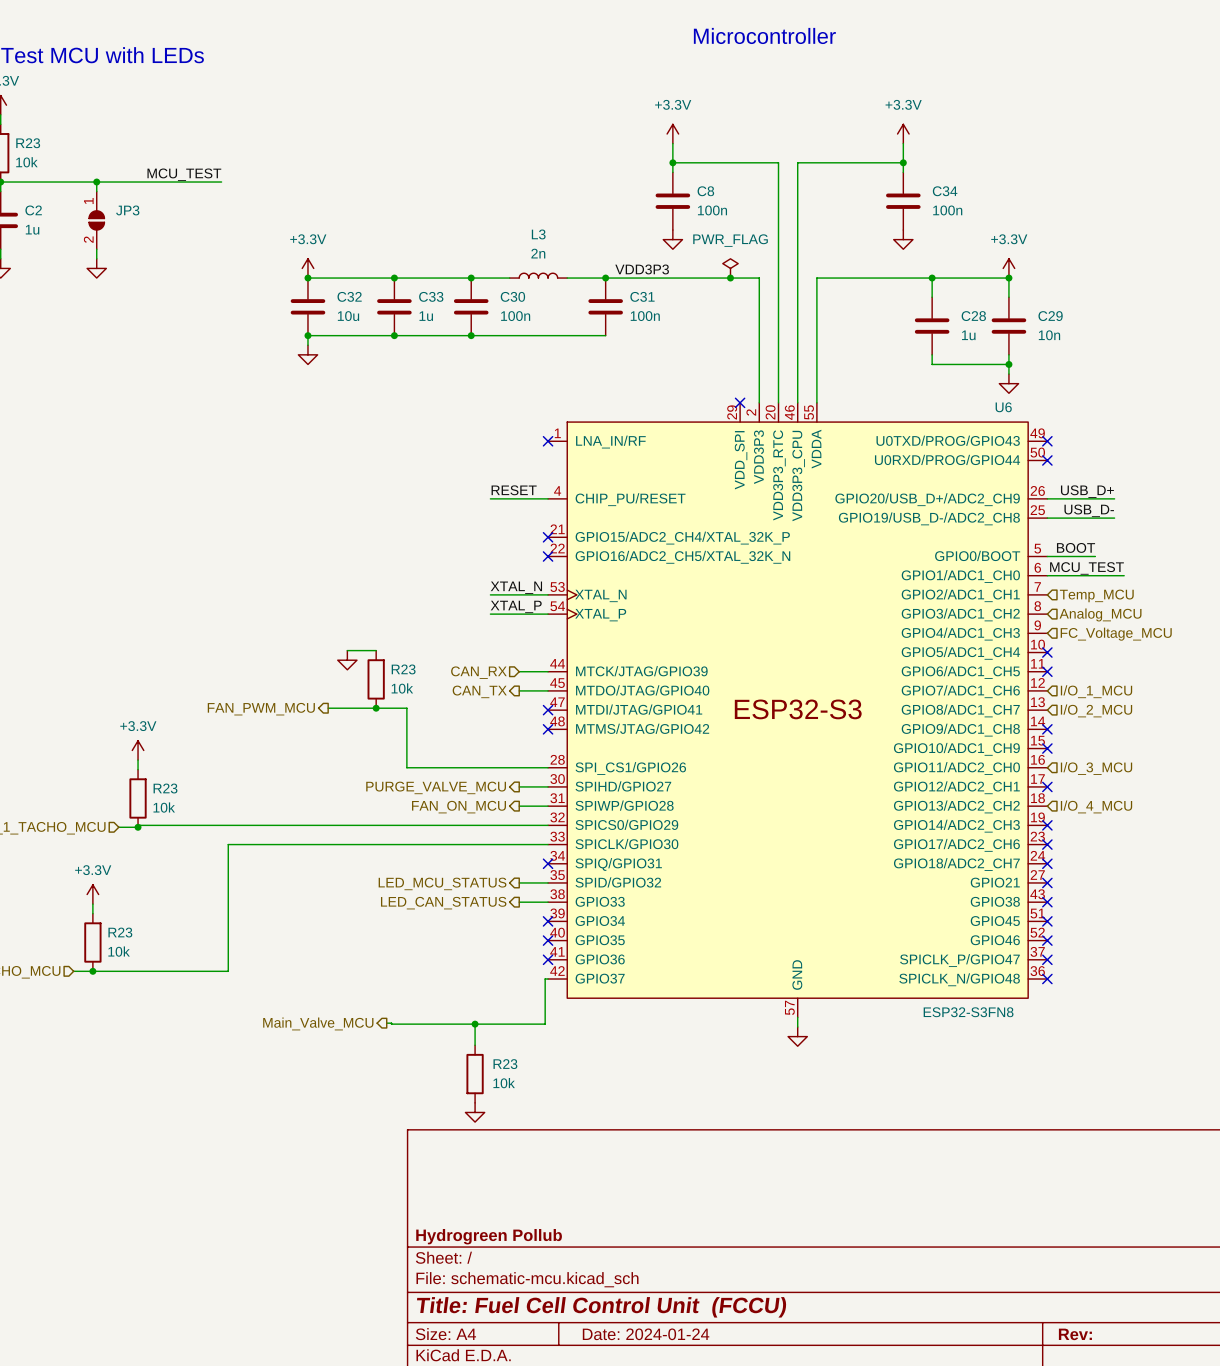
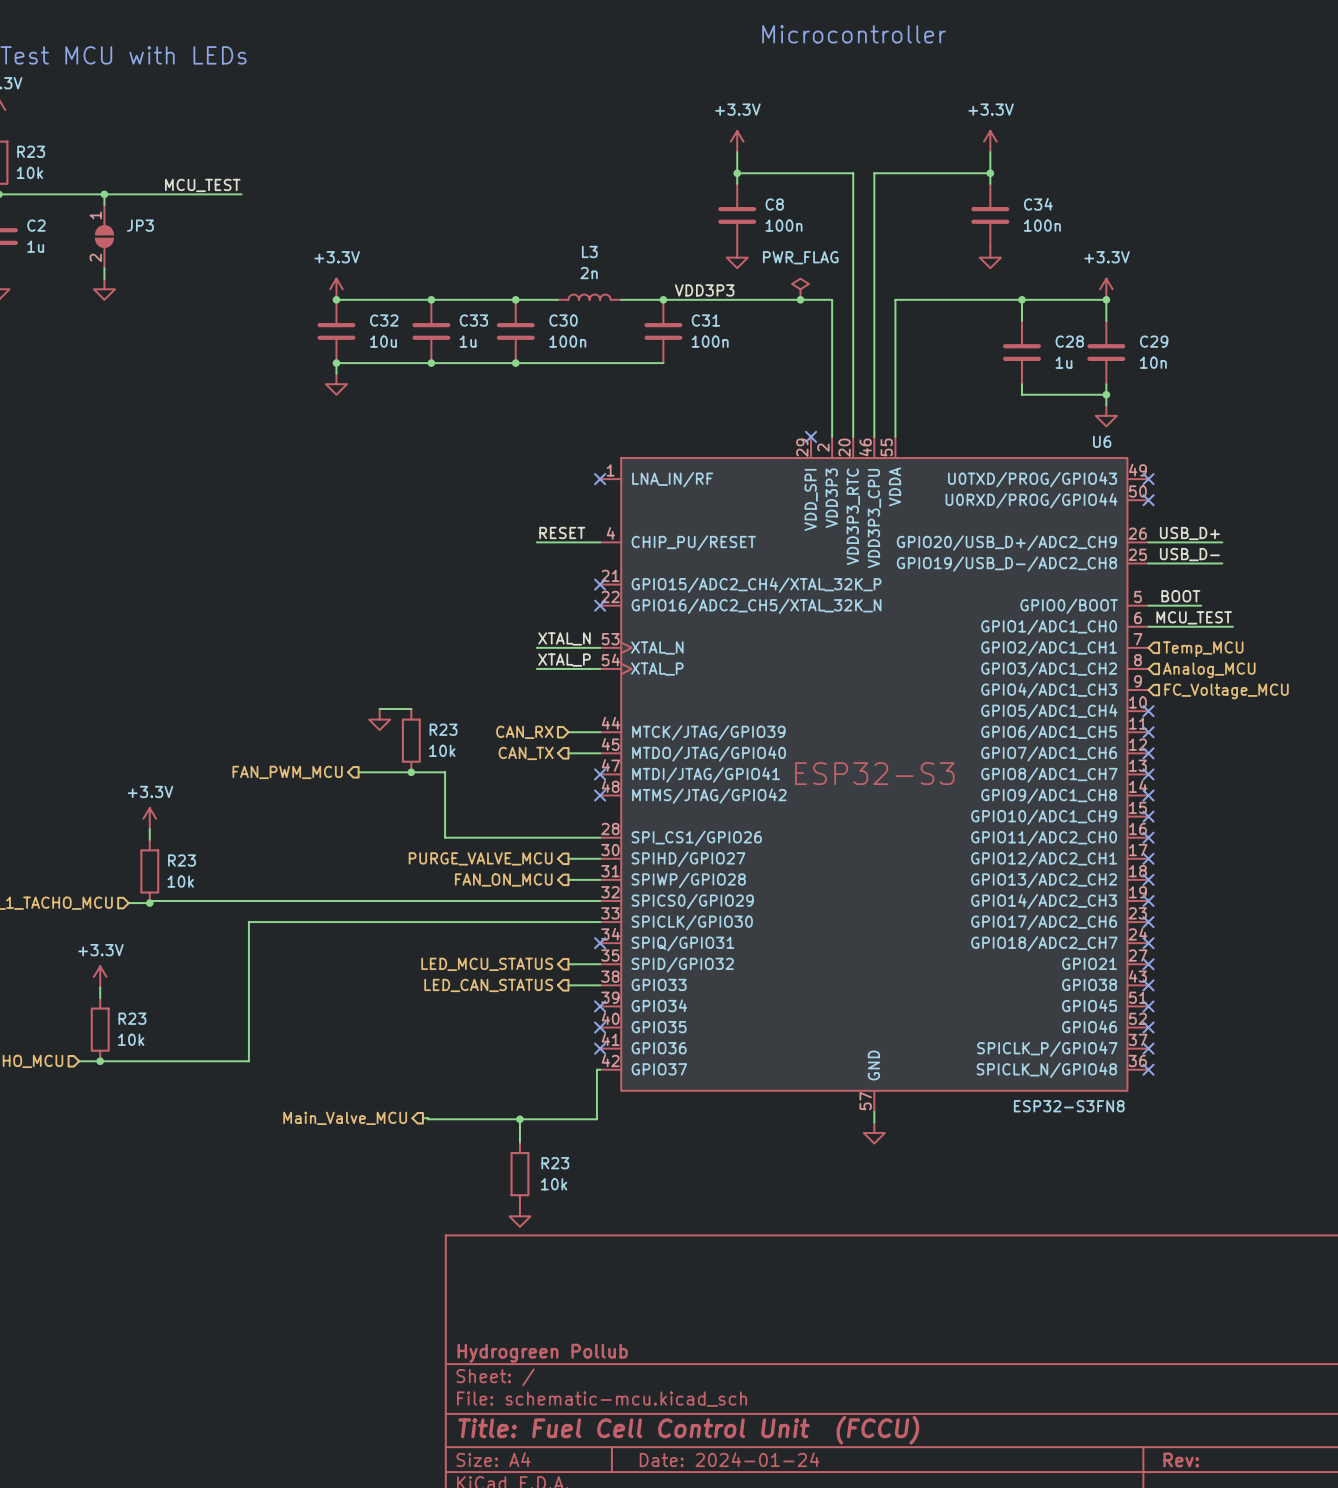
no-connect mark: none -> (1148, 753)
hierarchical label: I/O_1_MCU (1096, 691) -> none
no-connect mark: none -> (1148, 774)
hierarchical label: I/O_2_MCU (1096, 710) -> none
no-connect mark: none -> (1148, 837)
hierarchical label: I/O_3_MCU (1096, 768) -> none
no-connect mark: none -> (1148, 879)
hierarchical label: I/O_4_MCU (1096, 806) -> none

